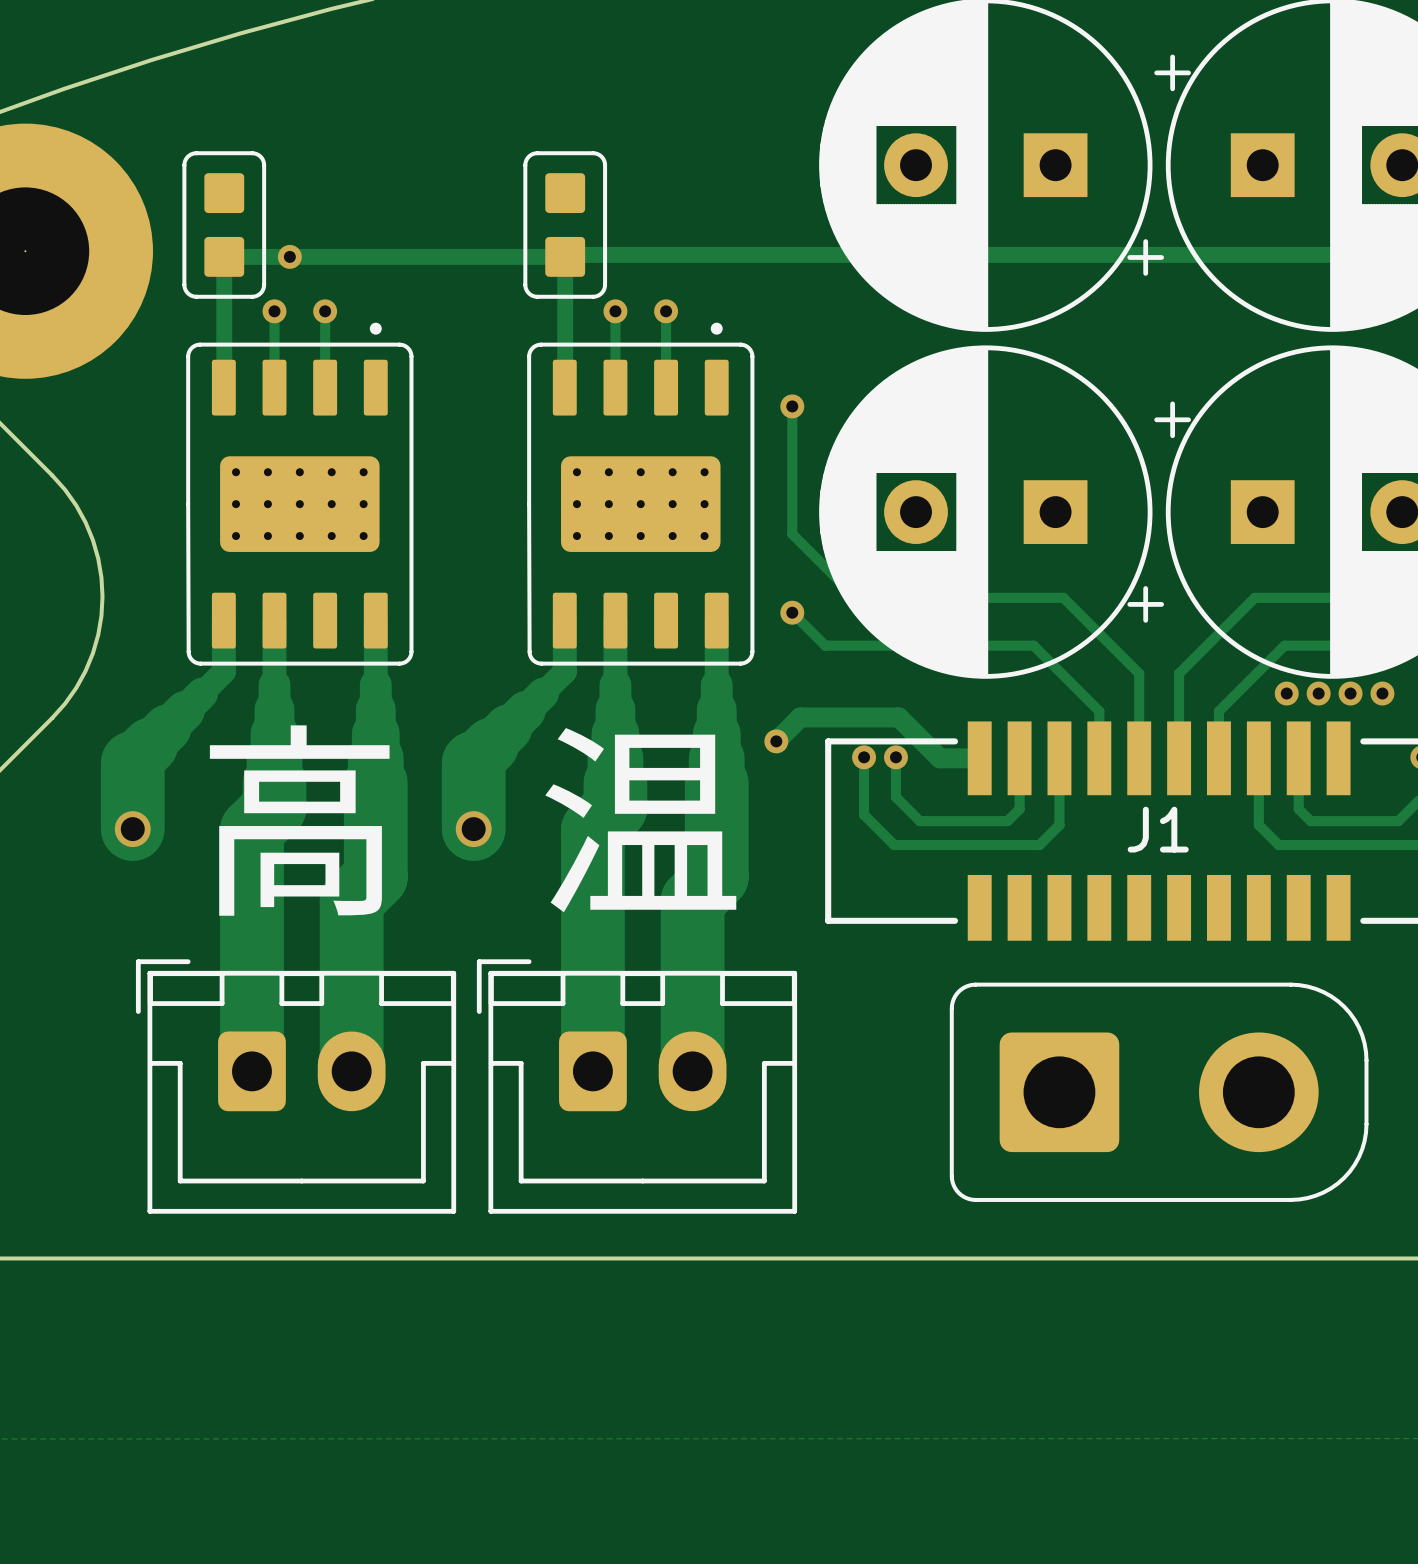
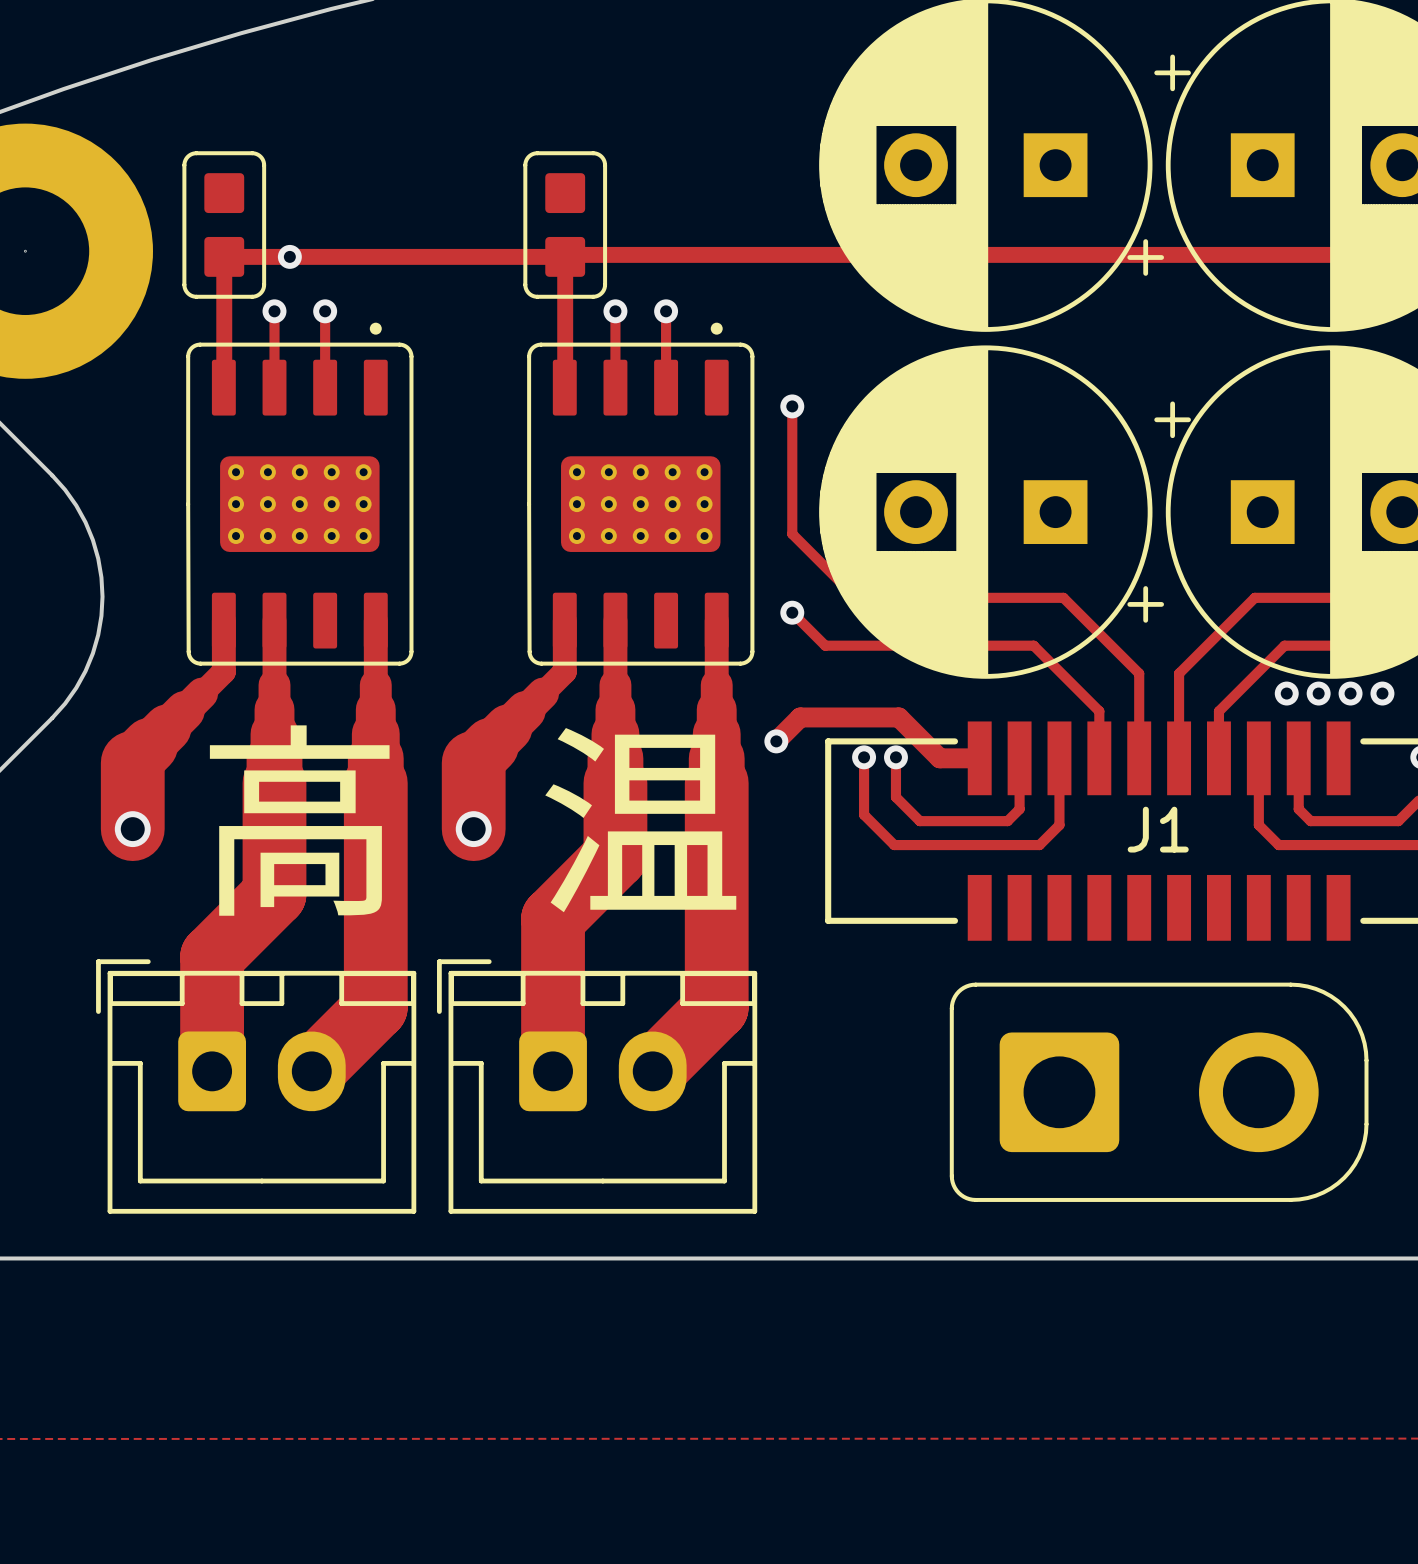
track: (274, 807) (251, 830) (251, 1071) -> (274, 807) (274, 894) (212, 956) (212, 1071)
track: (615, 807) (592, 830) (592, 1071) -> (615, 807) (615, 856) (553, 918) (553, 1071)
track: (375, 876) (351, 900) (351, 1071) -> (375, 876) (375, 1007) (311, 1071)
track: (716, 876) (692, 900) (692, 1071) -> (716, 876) (716, 1007) (652, 1071)
part position: (296, 1086) -> (256, 1086)
part position: (636, 1086) -> (597, 1086)

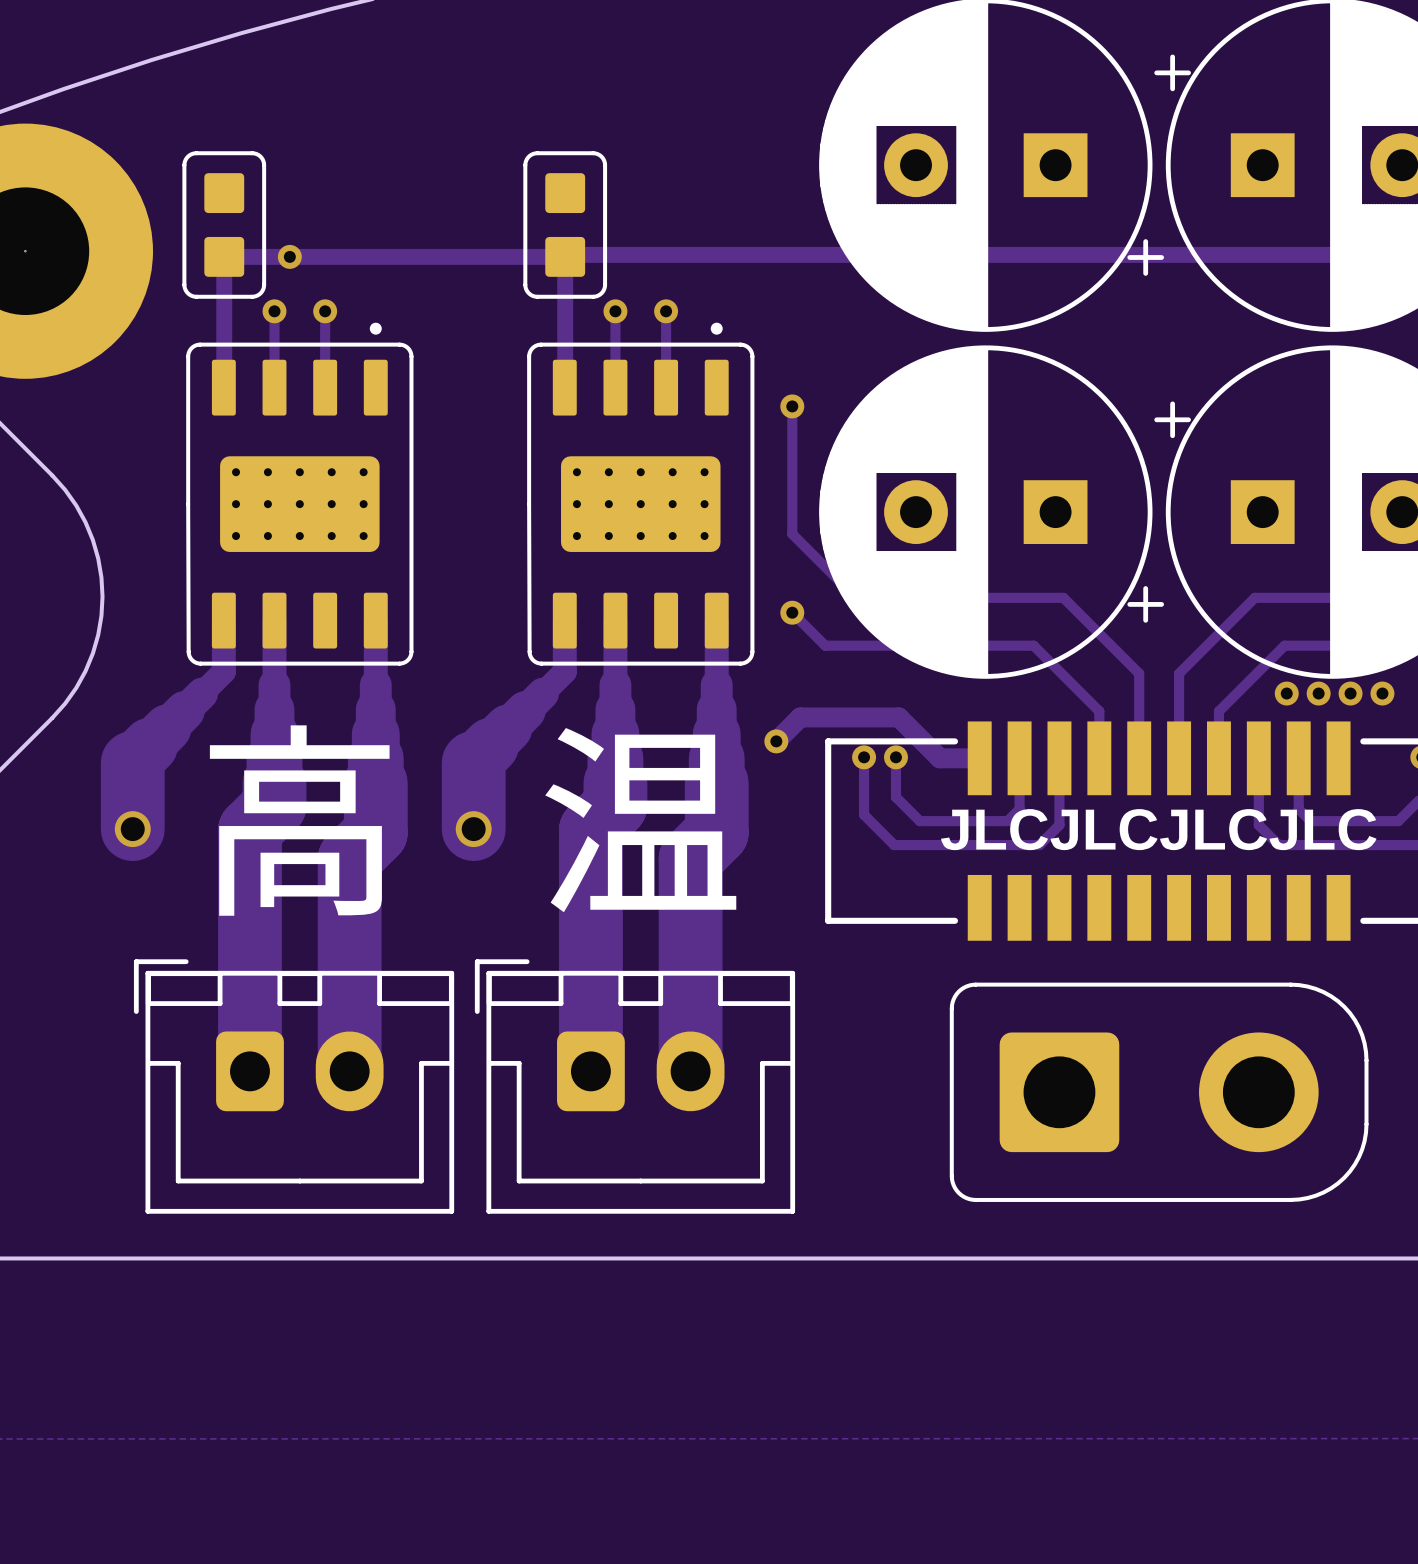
track: (274, 805) (274, 894) (212, 956) (212, 1071) -> (274, 805) (249, 830) (249, 1071)
track: (615, 805) (615, 856) (553, 918) (553, 1071) -> (615, 805) (590, 830) (590, 1071)
J1 name: J1 (1158, 829) -> none
text: none -> JLCJLCJLCJLC (1158, 829)
track: (375, 832) (375, 1007) (311, 1071) -> (375, 832) (349, 858) (349, 1071)
track: (716, 832) (716, 1007) (652, 1071) -> (716, 832) (690, 858) (690, 1071)
part position: (256, 1086) -> (294, 1086)
part position: (597, 1086) -> (634, 1086)

